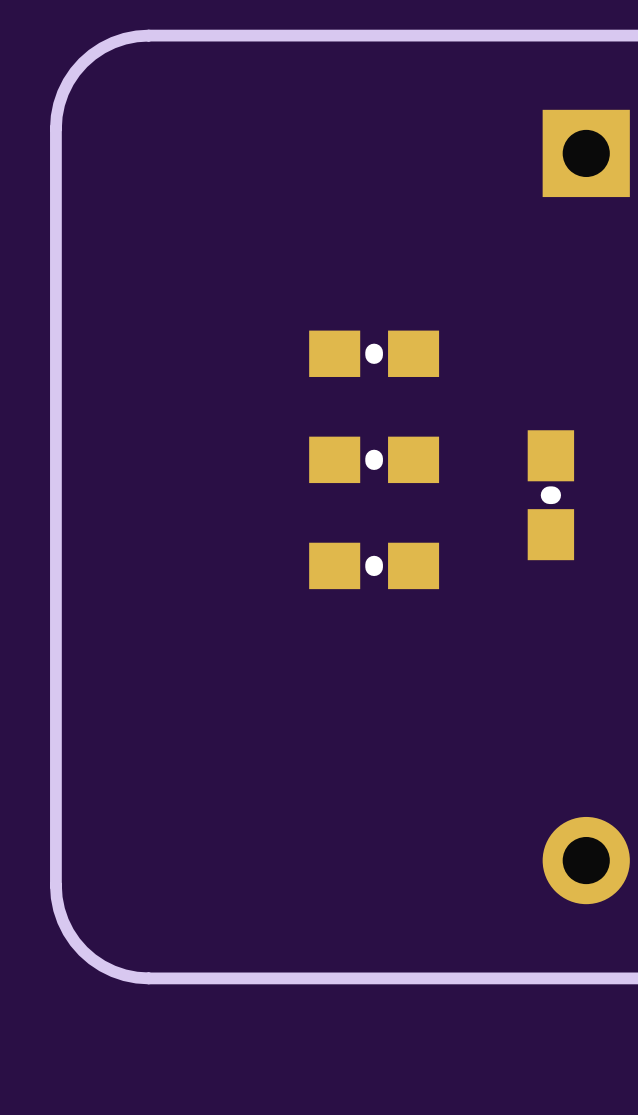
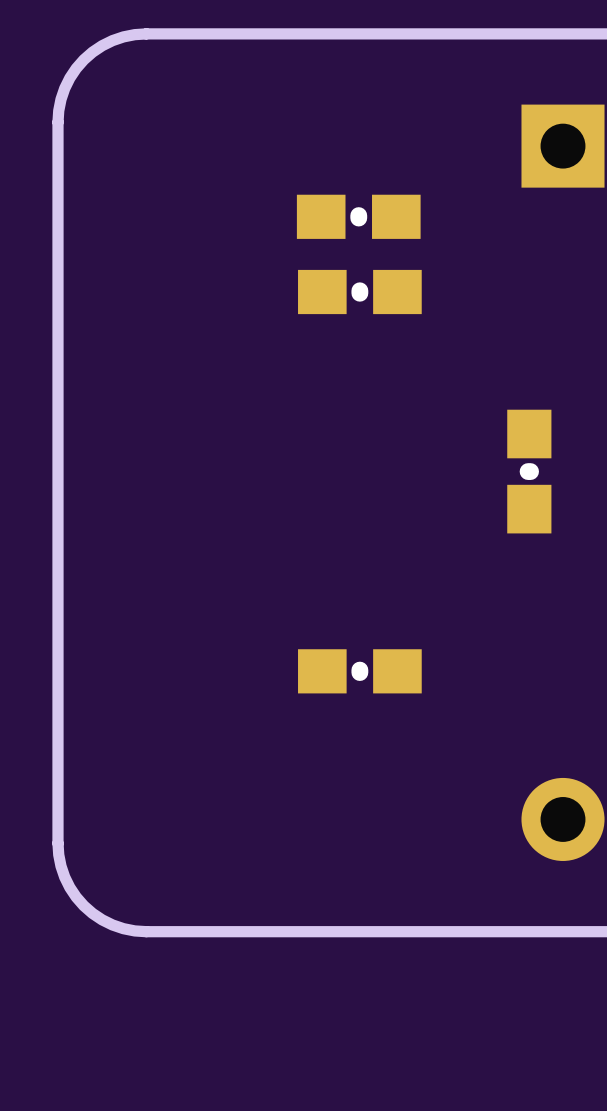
part: none -> (358, 216)
part position: (374, 353) -> (359, 292)
part: (374, 459) -> none
part: (374, 565) -> none
part: none -> (359, 671)

